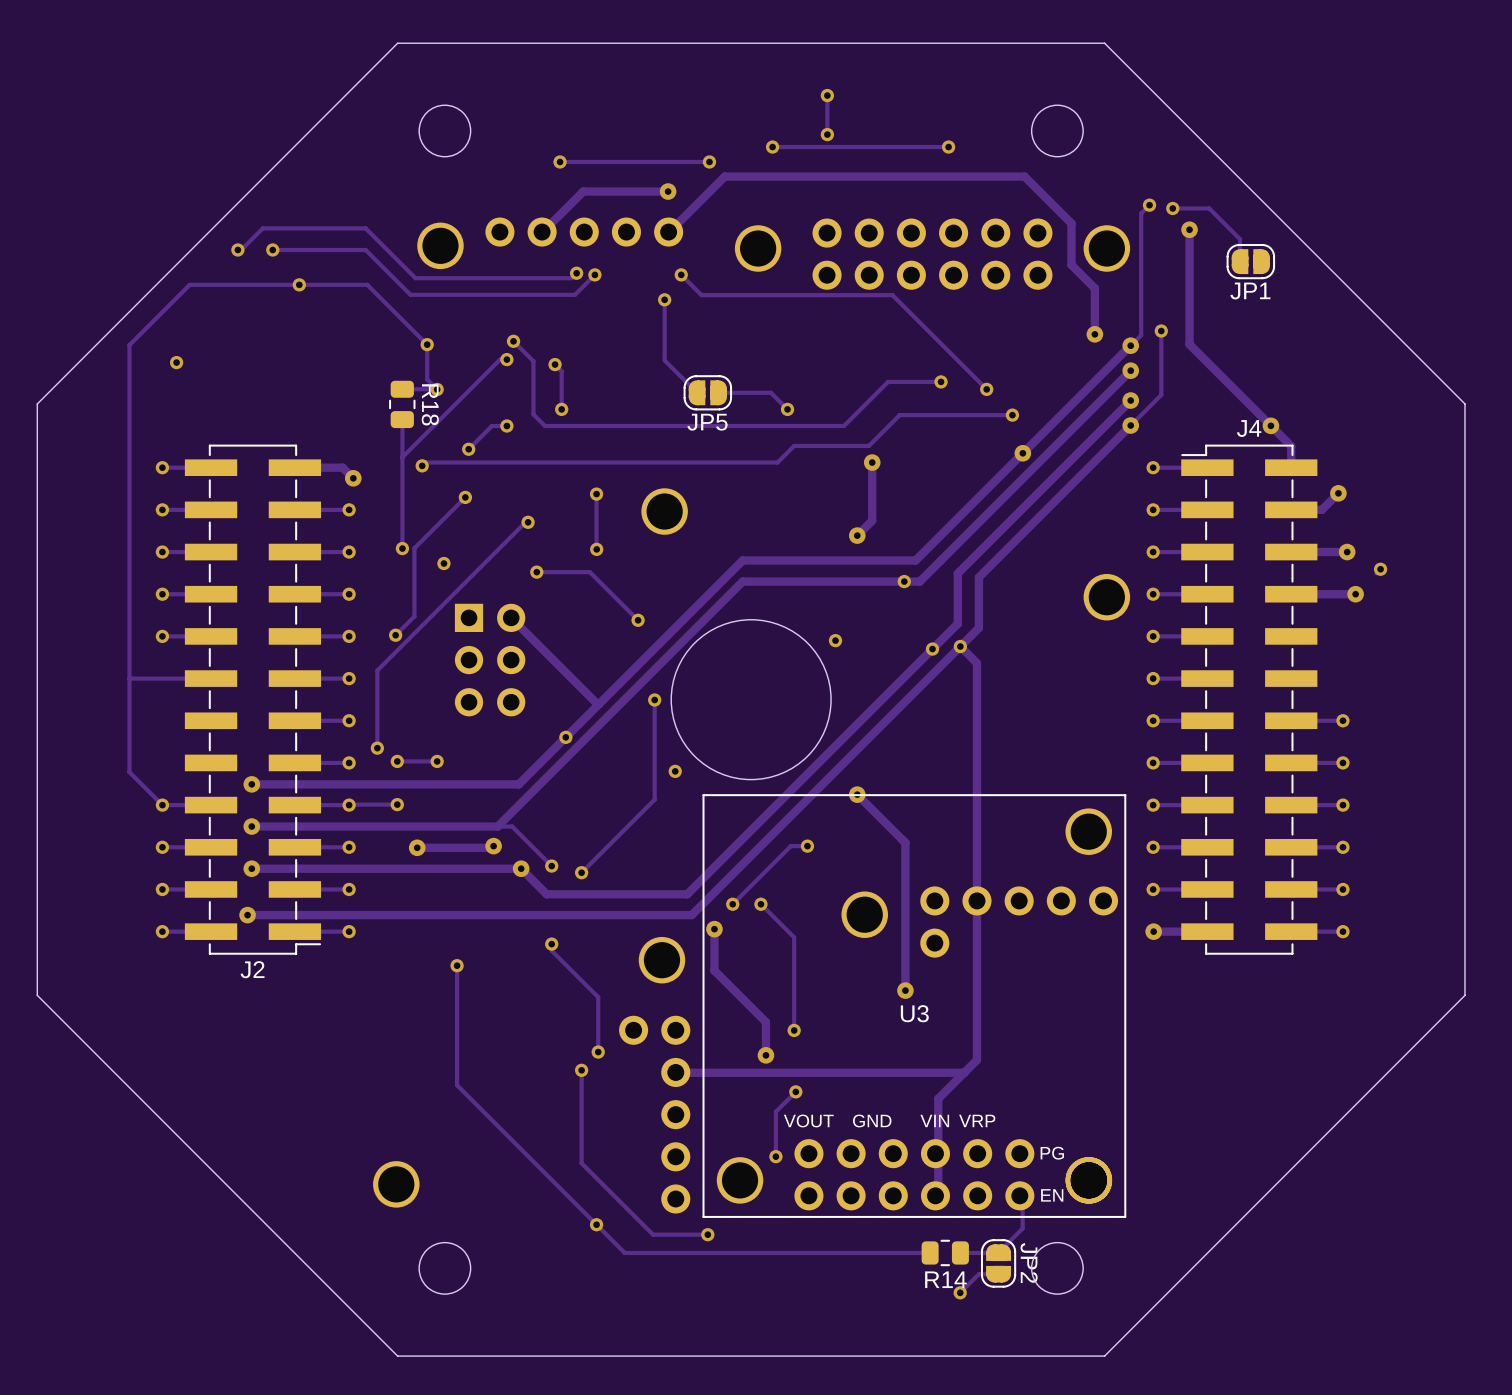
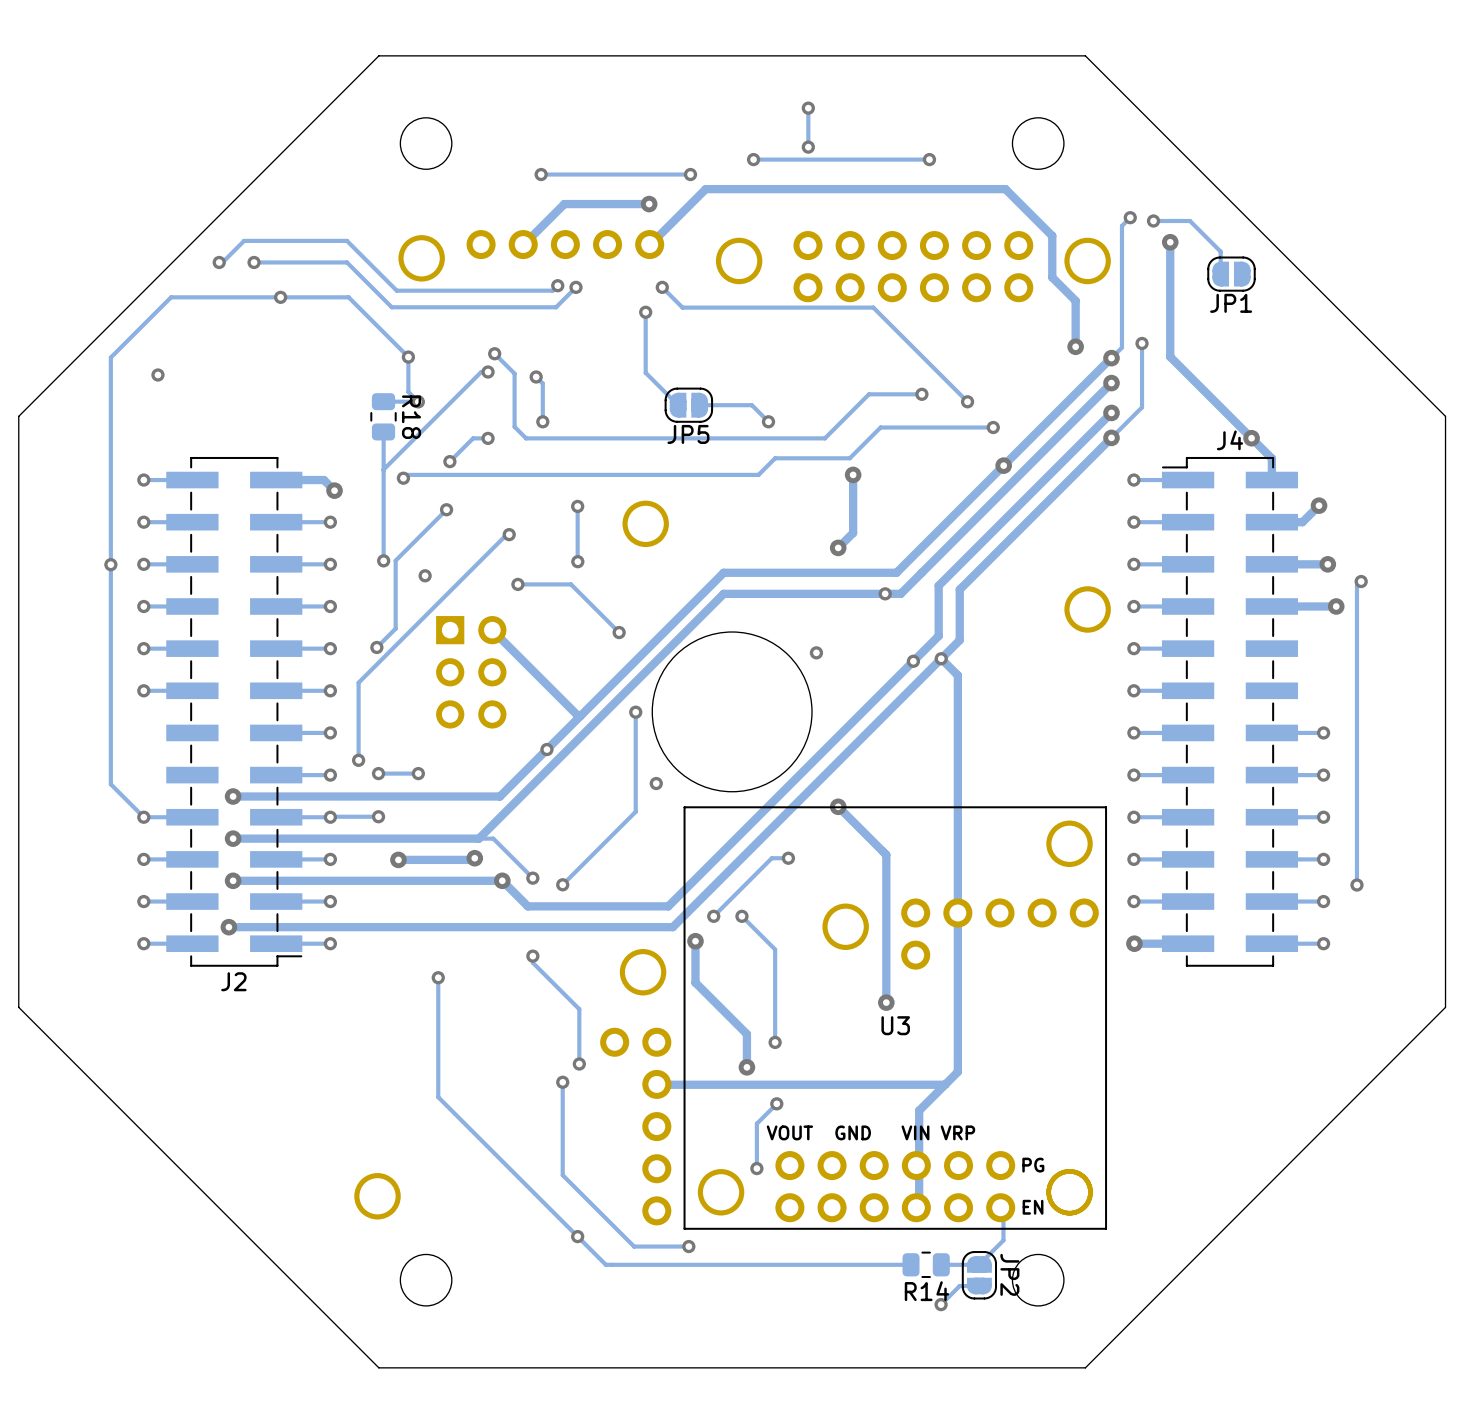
via: none -> (110, 564)
track: none -> (1356, 585) (1356, 885)
track: (162, 678) (129, 678) -> none
via: none -> (143, 690)
via: none -> (1356, 885)

